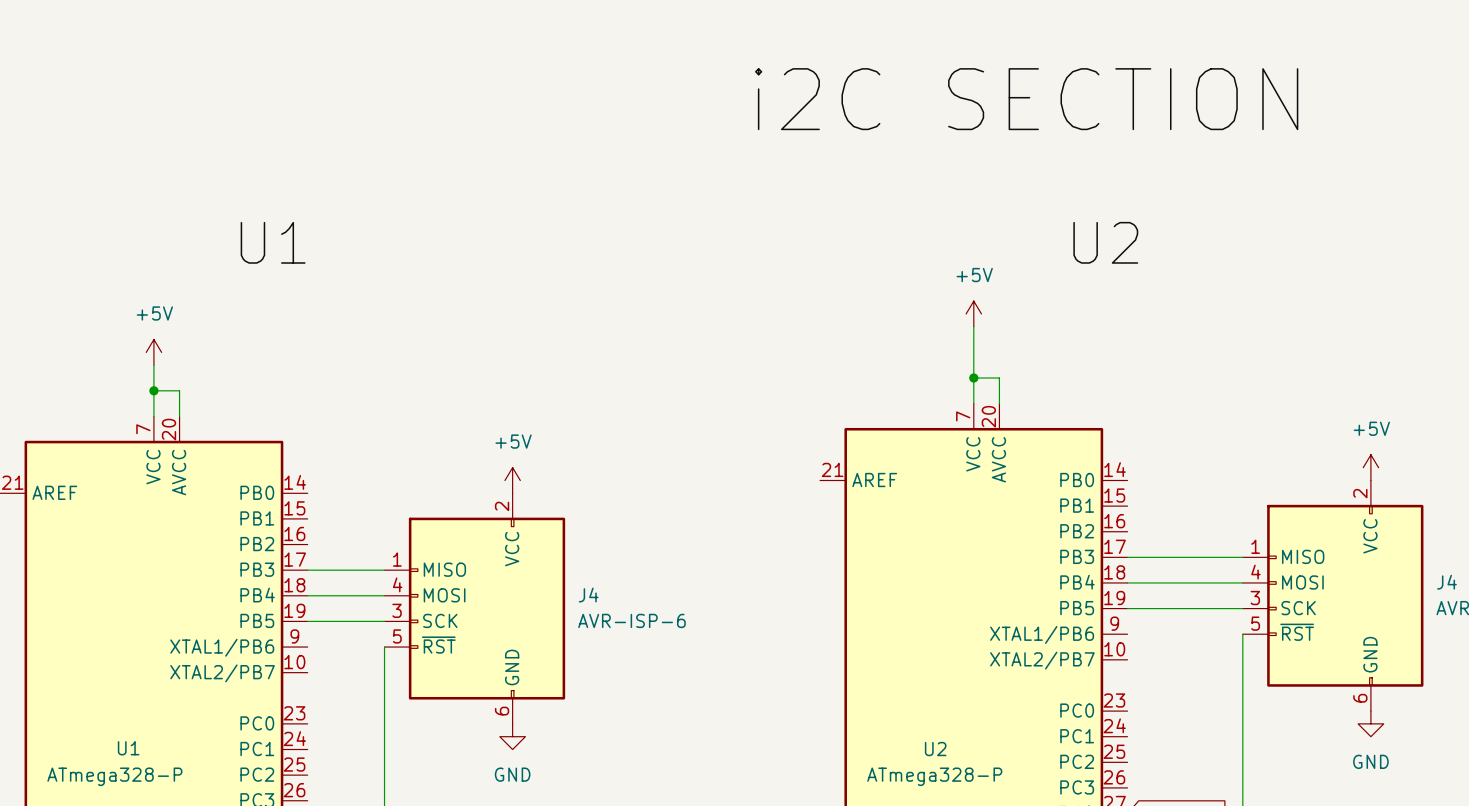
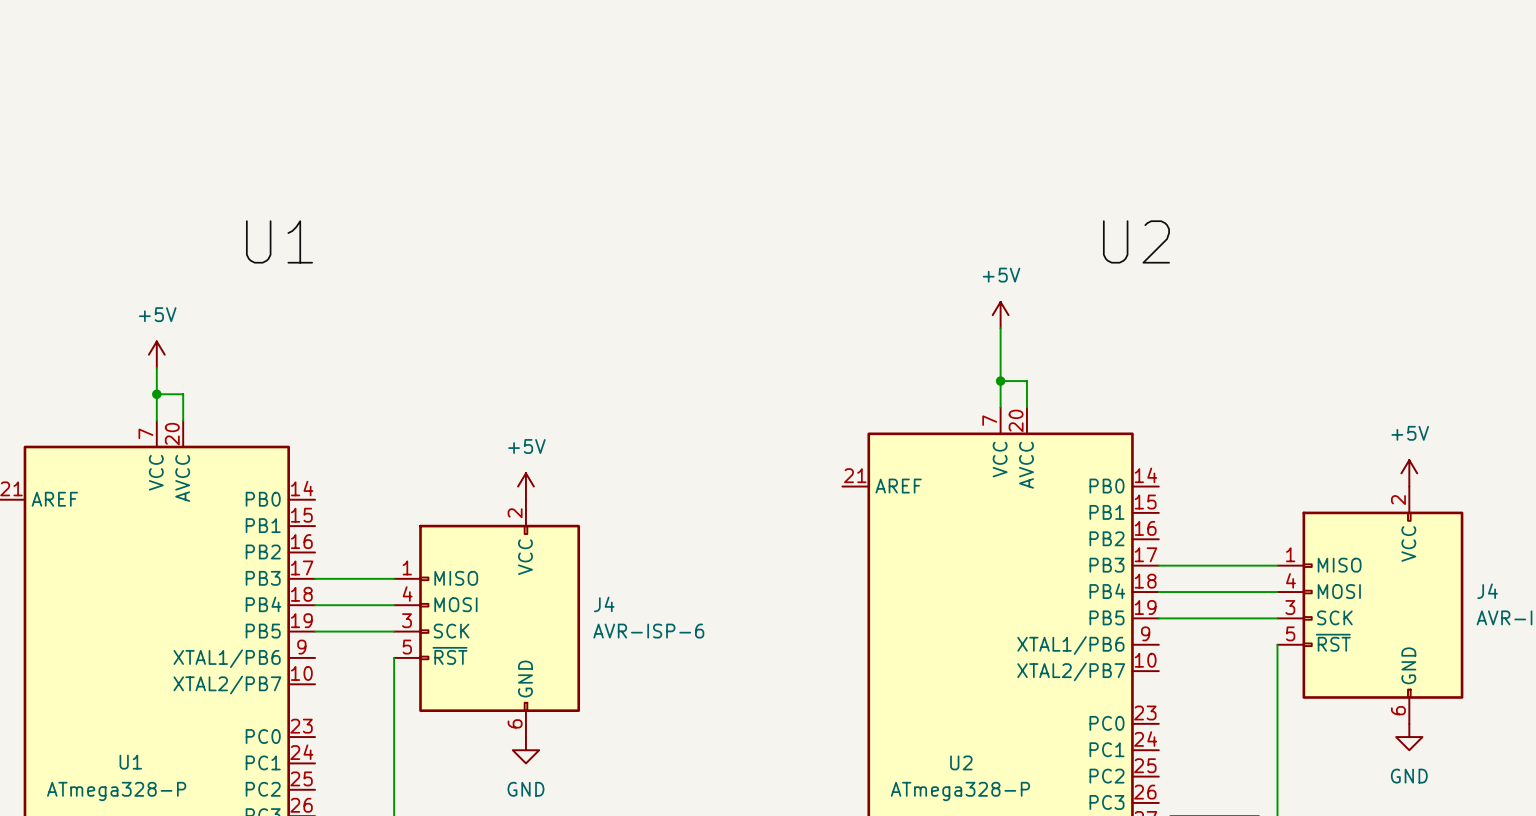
label: i2C SECTION (1026, 99) -> none

